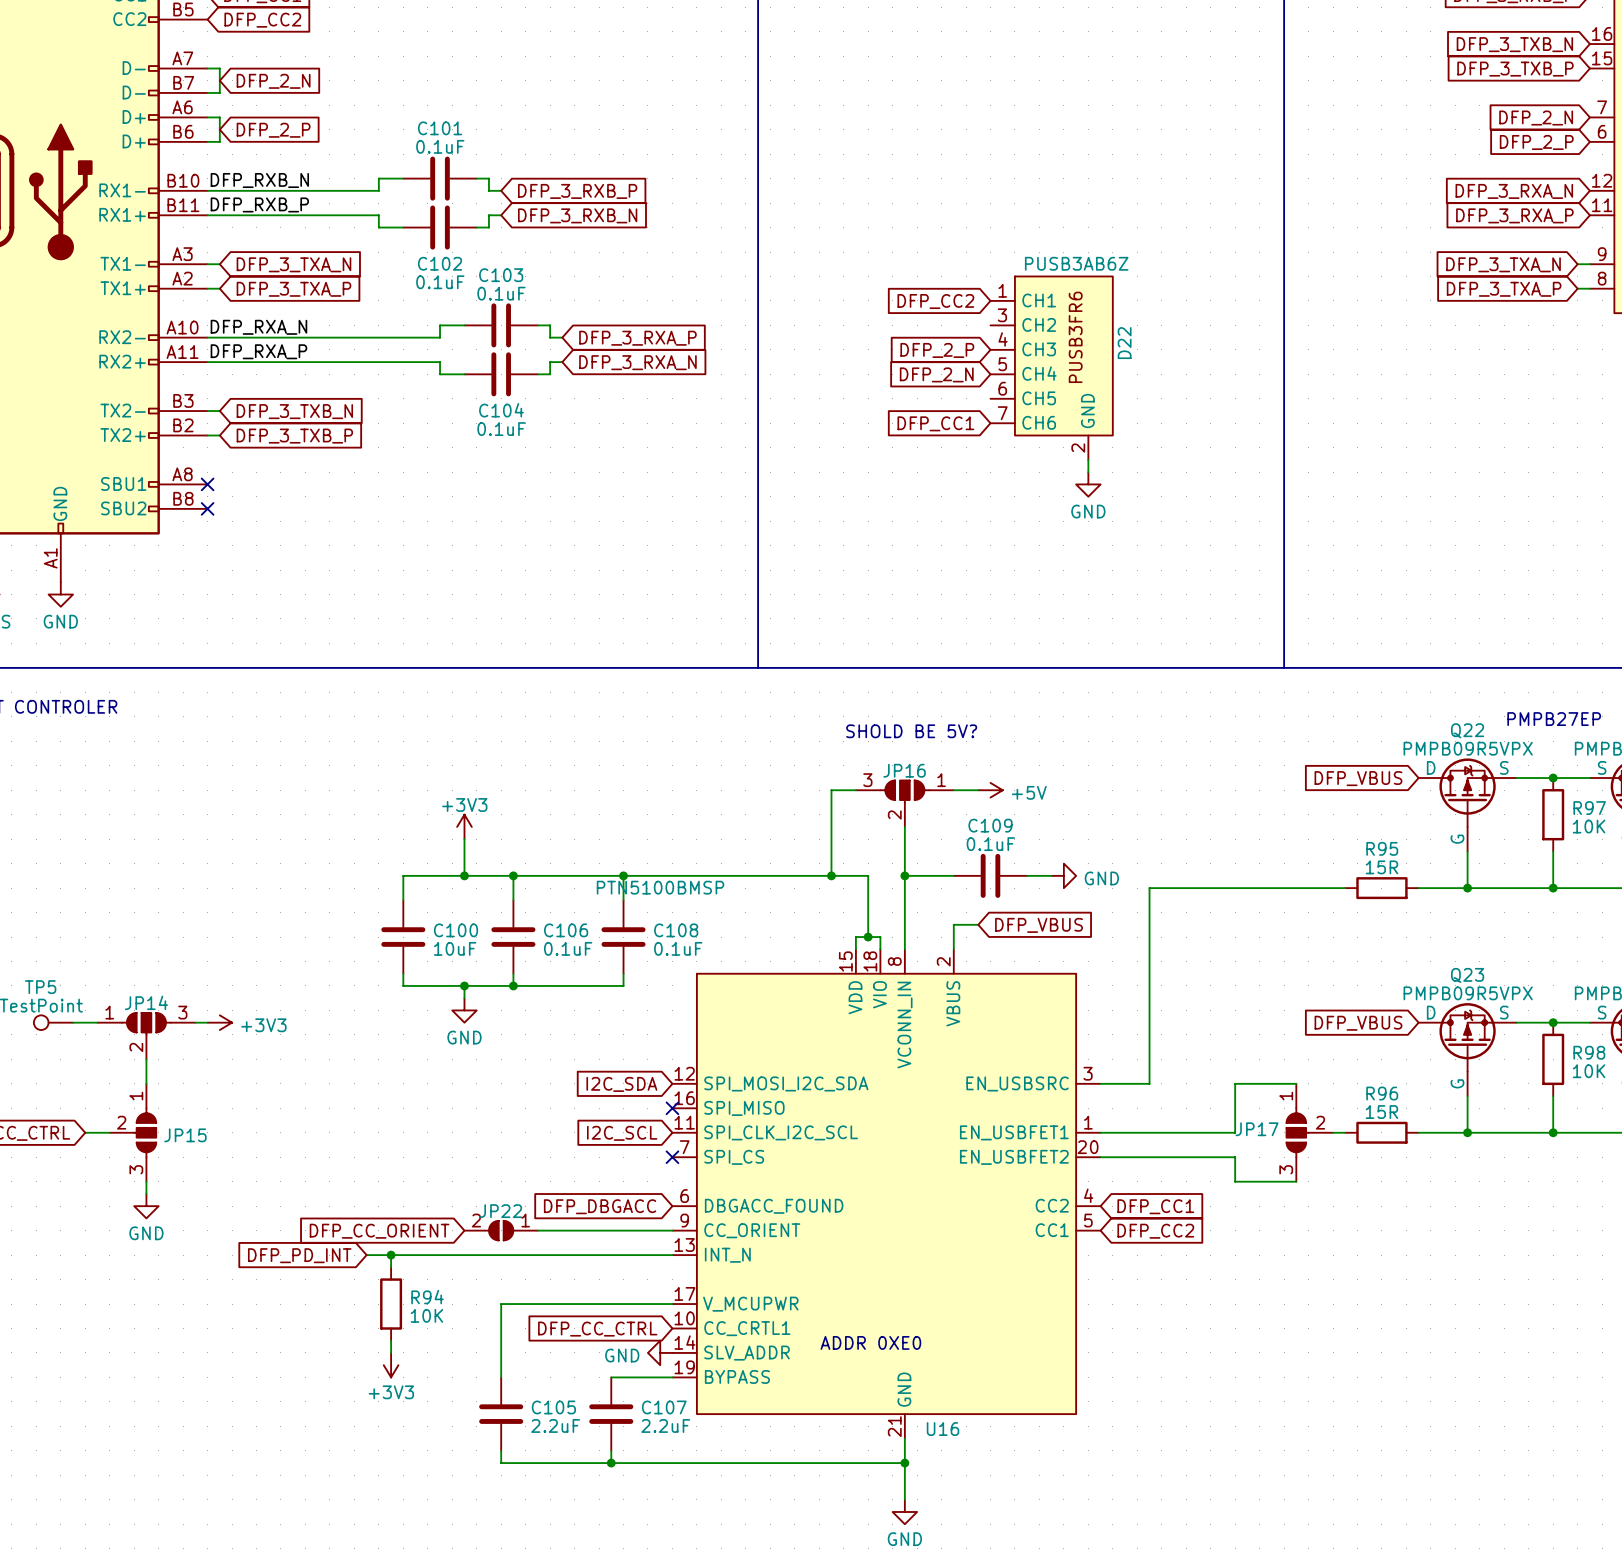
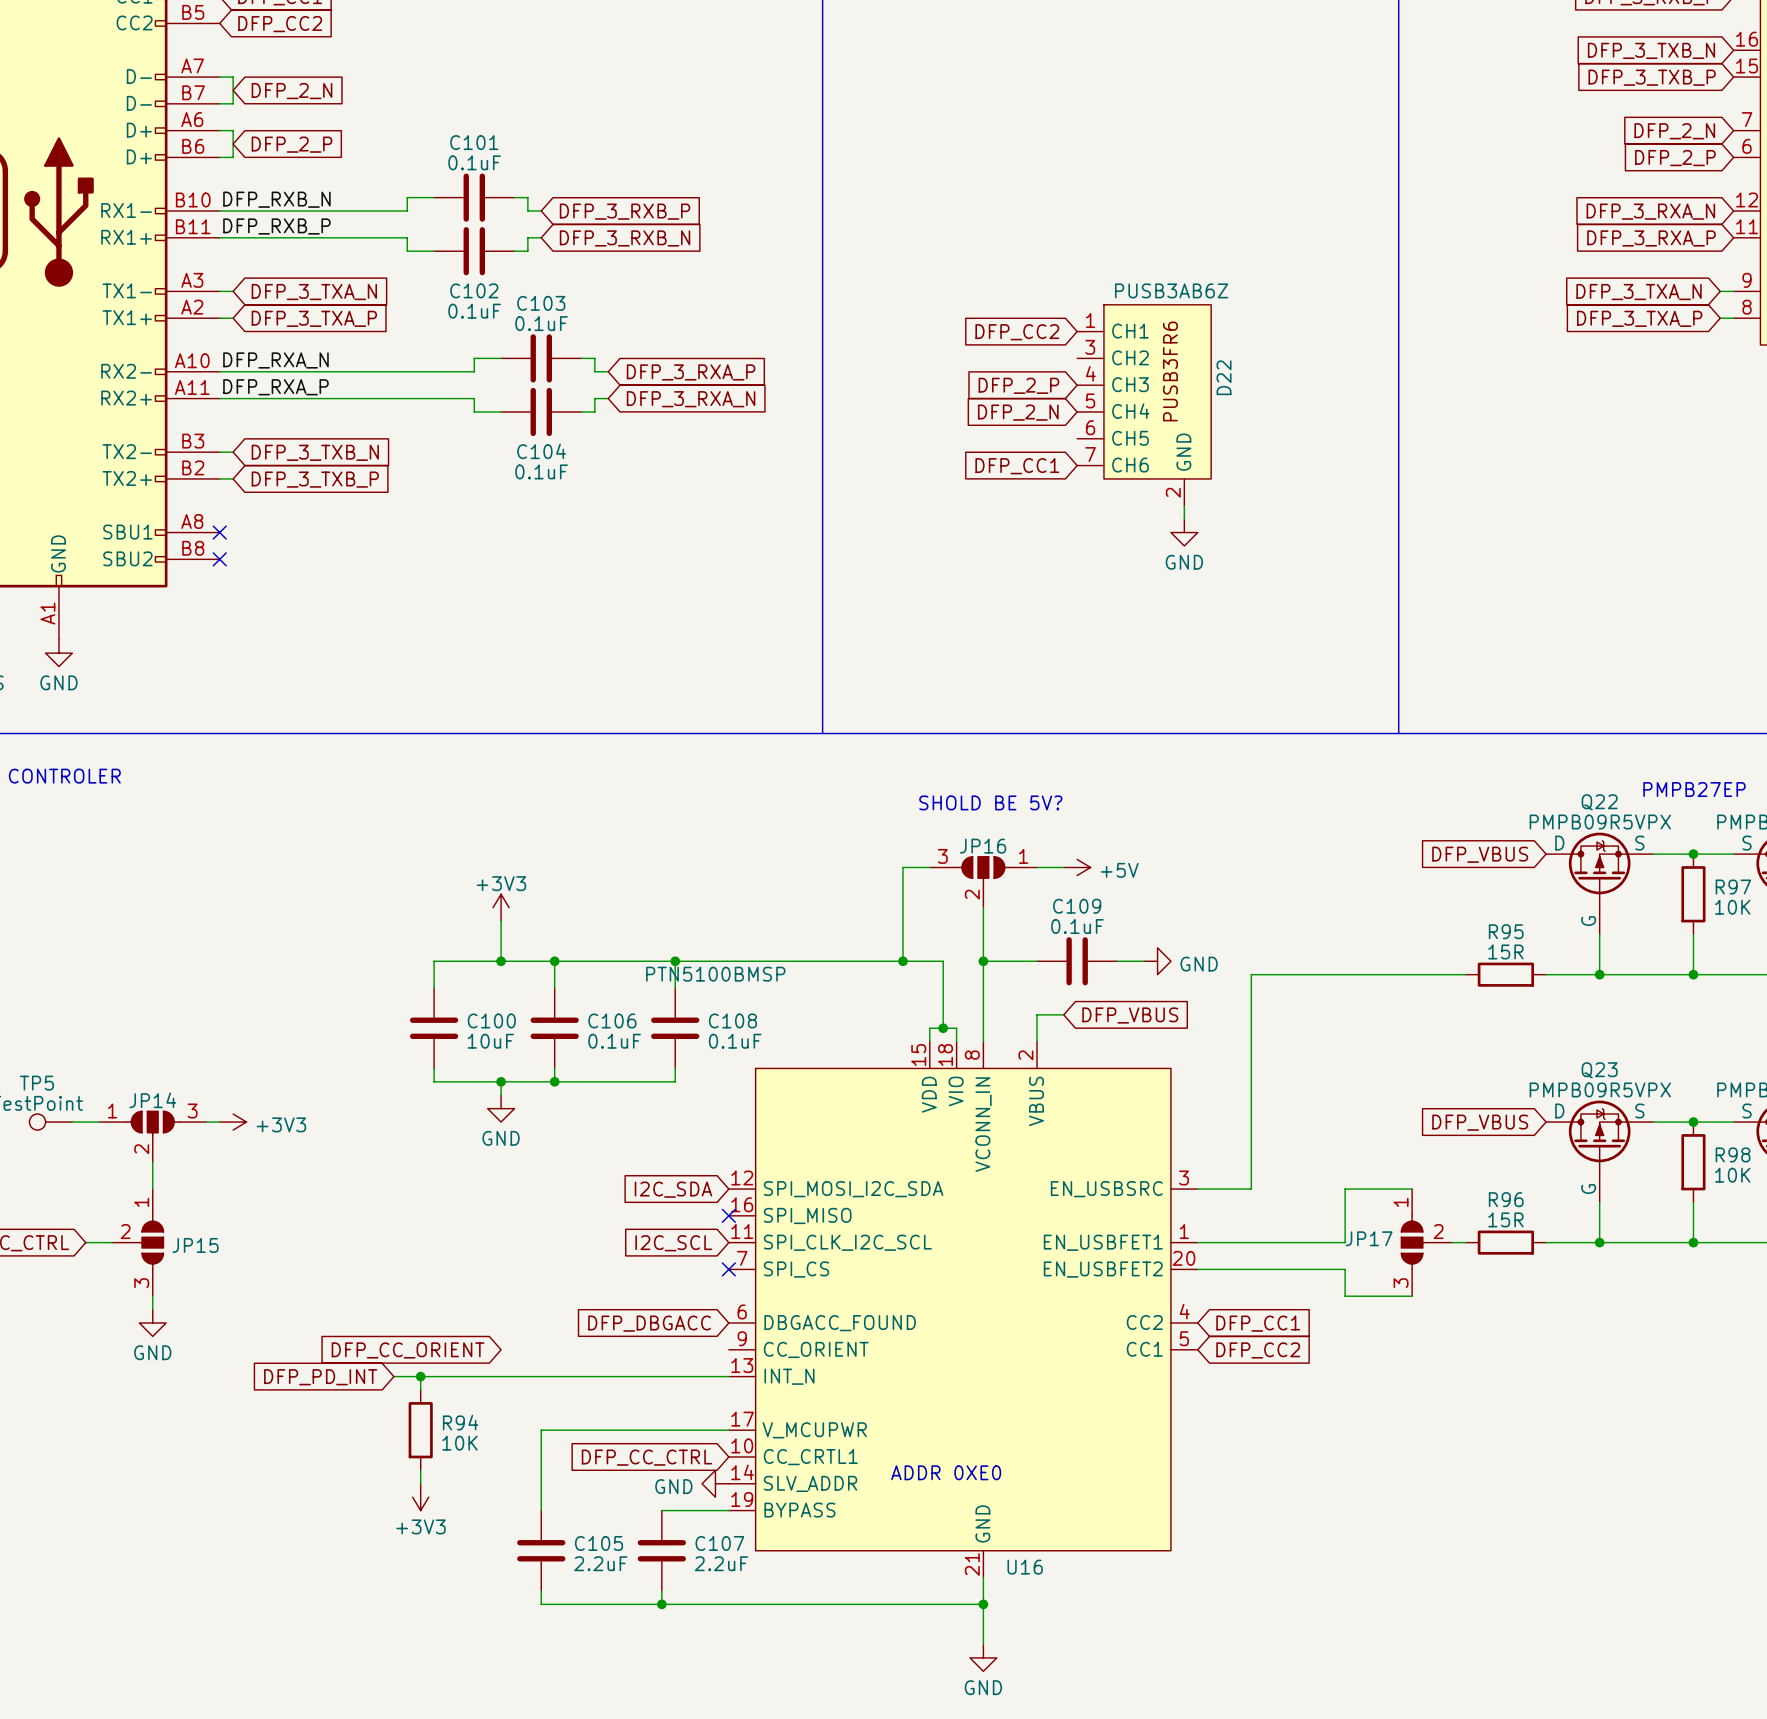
JP22: (501, 1230) -> none
wire: (537, 1230) (672, 1230) -> none

